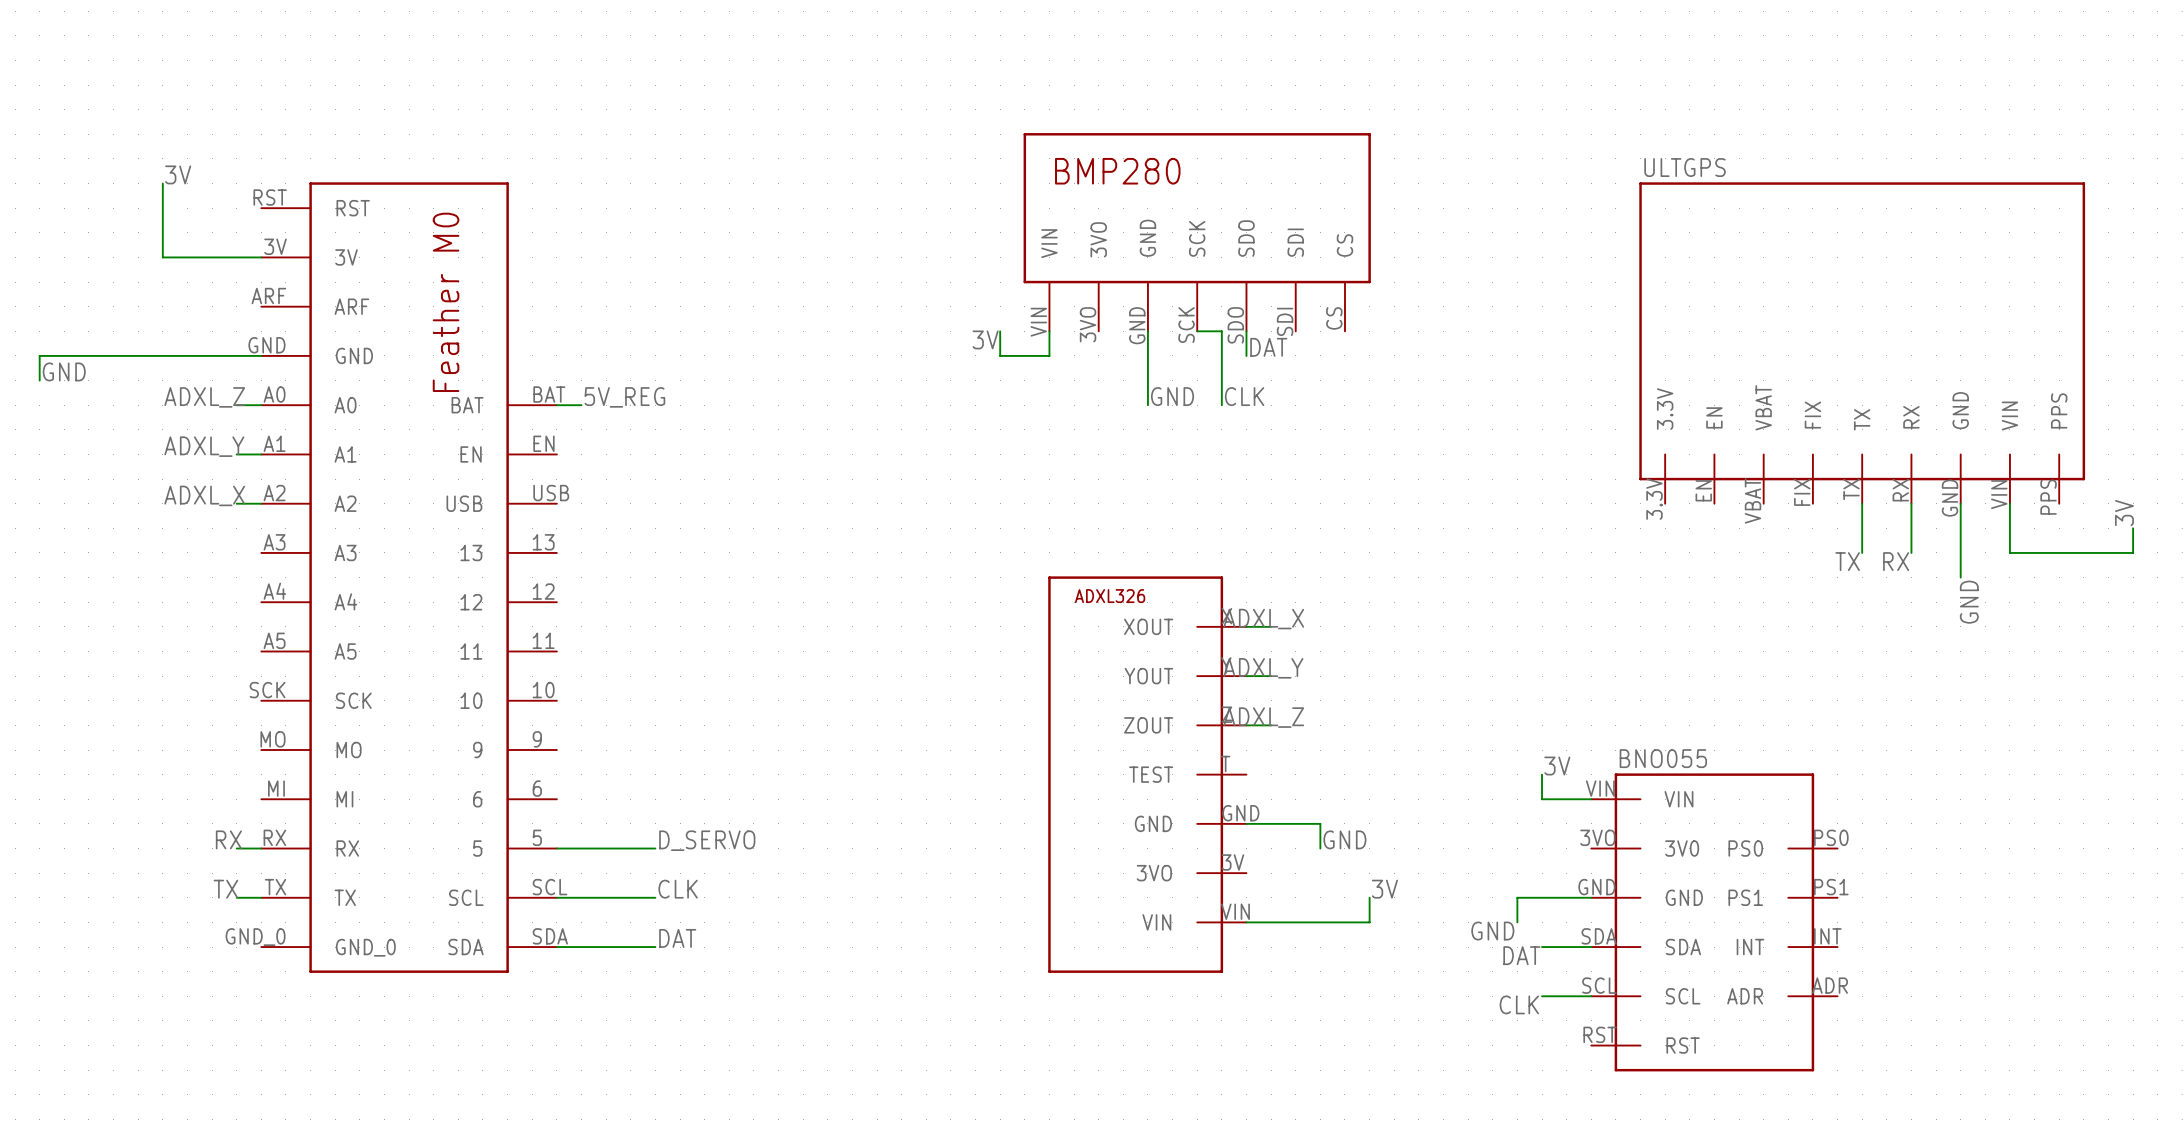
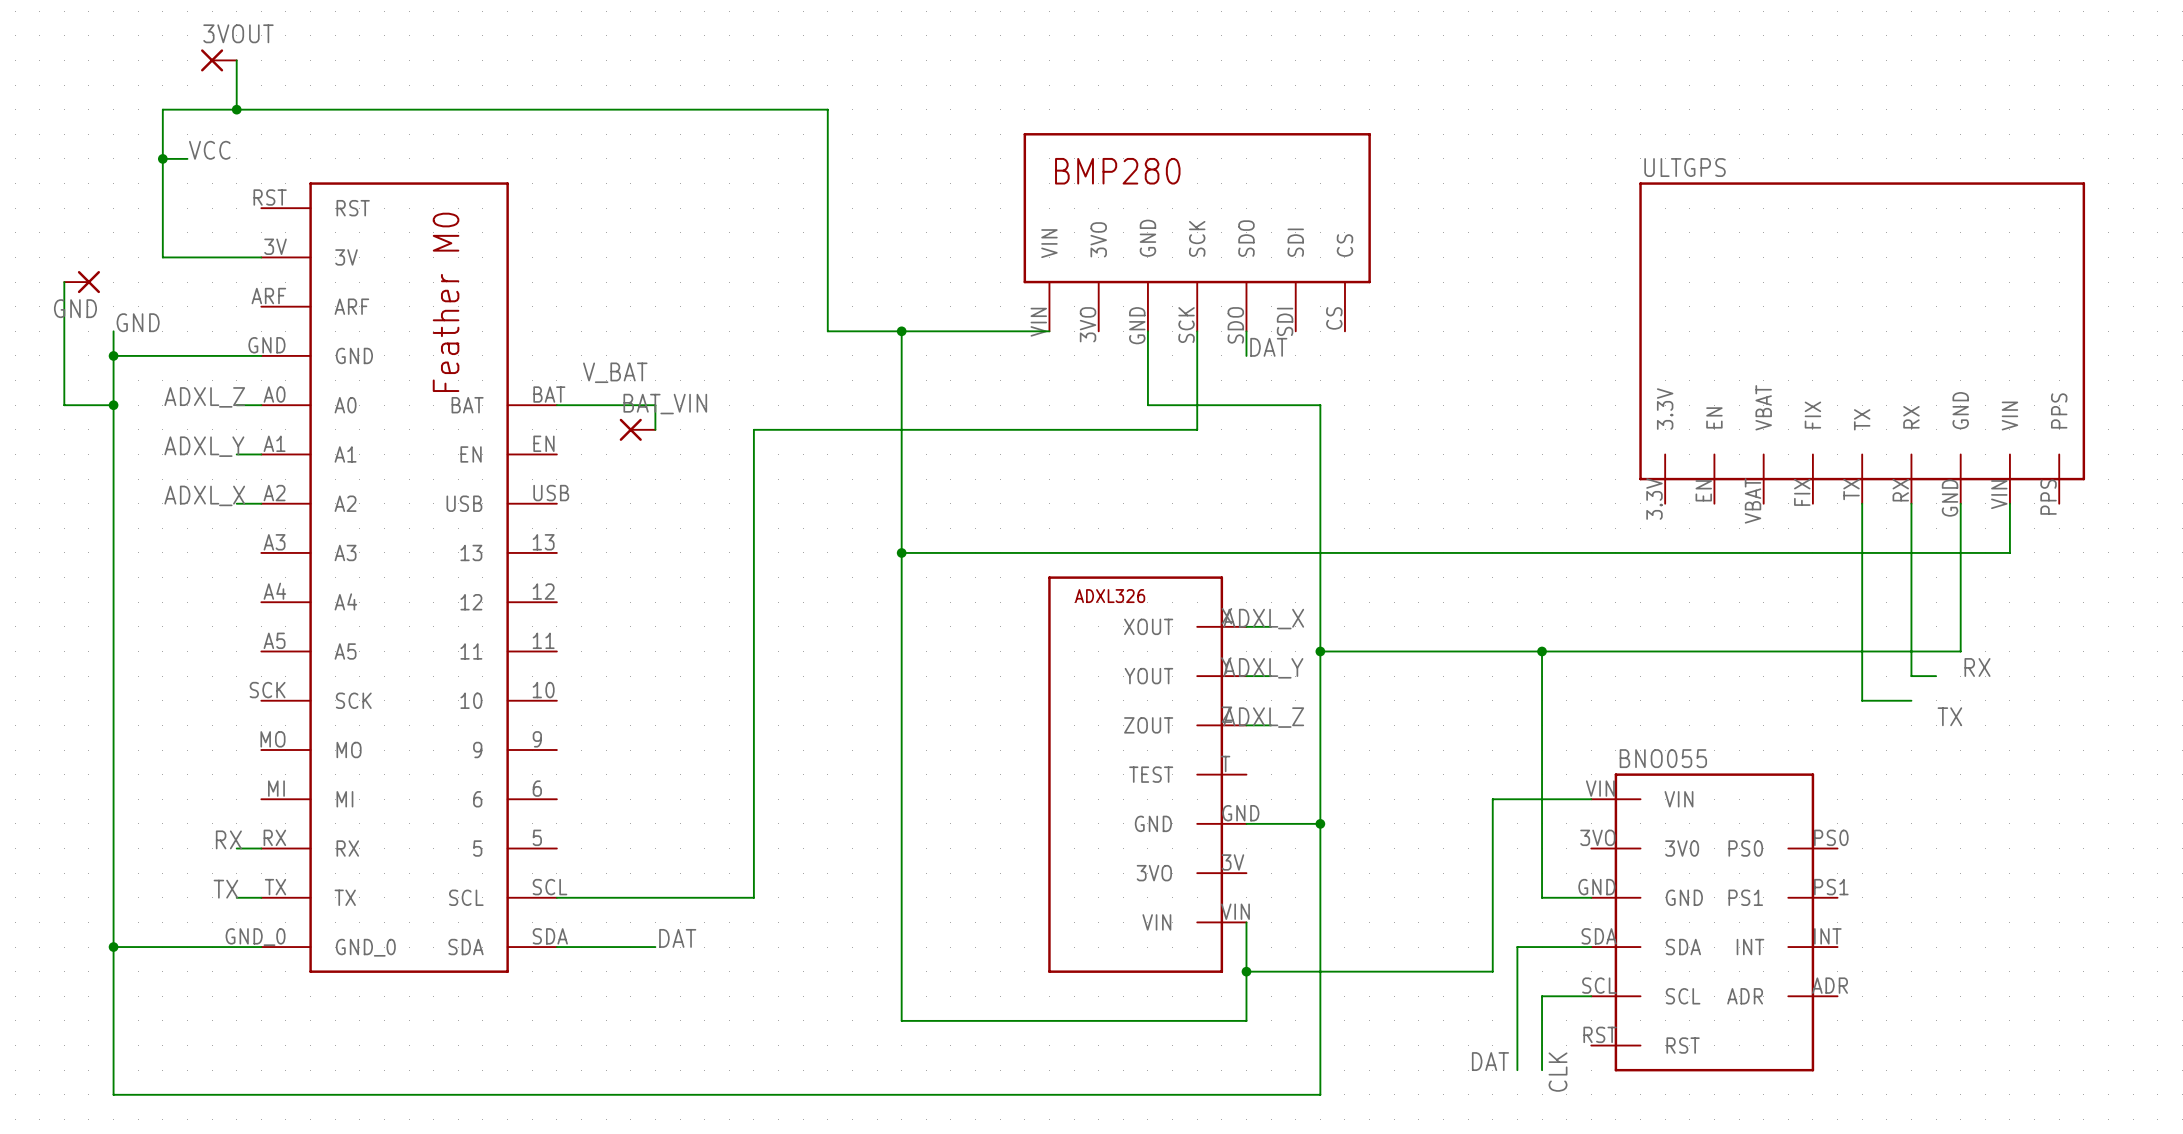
3VOUT: none -> (218, 60)
wire: none -> (236, 60) (236, 109)
junction: none -> (236, 109)
label: none -> VCC (209, 150)
wire: none -> (162, 158) (187, 158)
junction: none -> (162, 158)
label: 3V (178, 174) -> none
wire: none -> (64, 282) (64, 405) (113, 405)
GND: none -> (82, 282)
wire: none -> (113, 331) (113, 1094) (1320, 1094) (1320, 848)
junction: none -> (901, 331)
wire: (1000, 331) (1000, 355) (1049, 355) (1049, 331) -> (162, 183) (162, 109) (827, 109) (827, 331) (1049, 331)
wire: (1197, 331) (1221, 331) (1221, 405) -> (1197, 331) (1197, 429) (753, 429) (753, 897) (655, 897)
label: 3V (985, 339) -> none
wire: (113, 355) (39, 355) (39, 380) -> none
junction: none -> (113, 355)
label position: GND (64, 371) -> GND (138, 322)
label: none -> V_BAT (615, 372)
label: GND (1172, 396) -> none
label: CLK (1244, 396) -> none
label: 5V_REG (624, 397) -> none
junction: none -> (113, 405)
wire: none -> (581, 405) (655, 405) (655, 429)
wire: none -> (1147, 405) (1320, 405) (1320, 823)
BAT_VIN: none -> (637, 429)
label: 3V (2124, 513) -> none
wire: (2133, 528) (2133, 552) (2009, 552) -> (901, 552) (2009, 552)
junction: none -> (901, 552)
wire: none -> (1862, 552) (1862, 700) (1911, 700)
wire: none -> (1911, 552) (1911, 676) (1936, 676)
label position: TX (1847, 561) -> TX (1949, 716)
label position: RX (1896, 561) -> RX (1977, 667)
wire: none -> (1960, 577) (1960, 651) (1320, 651)
label: GND (1969, 602) -> none
junction: none -> (1320, 651)
wire: none -> (1542, 651) (1542, 774)
junction: none -> (1542, 651)
label: 3V (1557, 766) -> none
junction: none -> (1320, 823)
label: GND (1344, 839) -> none
label: D_SERVO (707, 840) -> none
wire: (556, 848) (655, 848) -> none
label: CLK (678, 889) -> none
label: 3V (1384, 889) -> none
wire: (1369, 897) (1369, 922) (1246, 922) -> (901, 331) (901, 1020) (1246, 1020) (1246, 922)
wire: (1542, 897) (1517, 897) (1517, 922) -> (1542, 897) (1542, 799) (1492, 799) (1492, 971) (1246, 971)
label: GND (1492, 931) -> none
wire: none -> (113, 947) (261, 947)
junction: none -> (113, 947)
wire: none -> (1542, 947) (1517, 947) (1517, 1070)
label position: DAT (1521, 955) -> DAT (1490, 1061)
junction: none -> (1246, 971)
wire: none -> (1542, 996) (1542, 1070)
label rotation: 0° (1519, 1004) -> 90° counterclockwise (1558, 1072)
label position: CLK (1519, 1004) -> CLK (1558, 1072)

